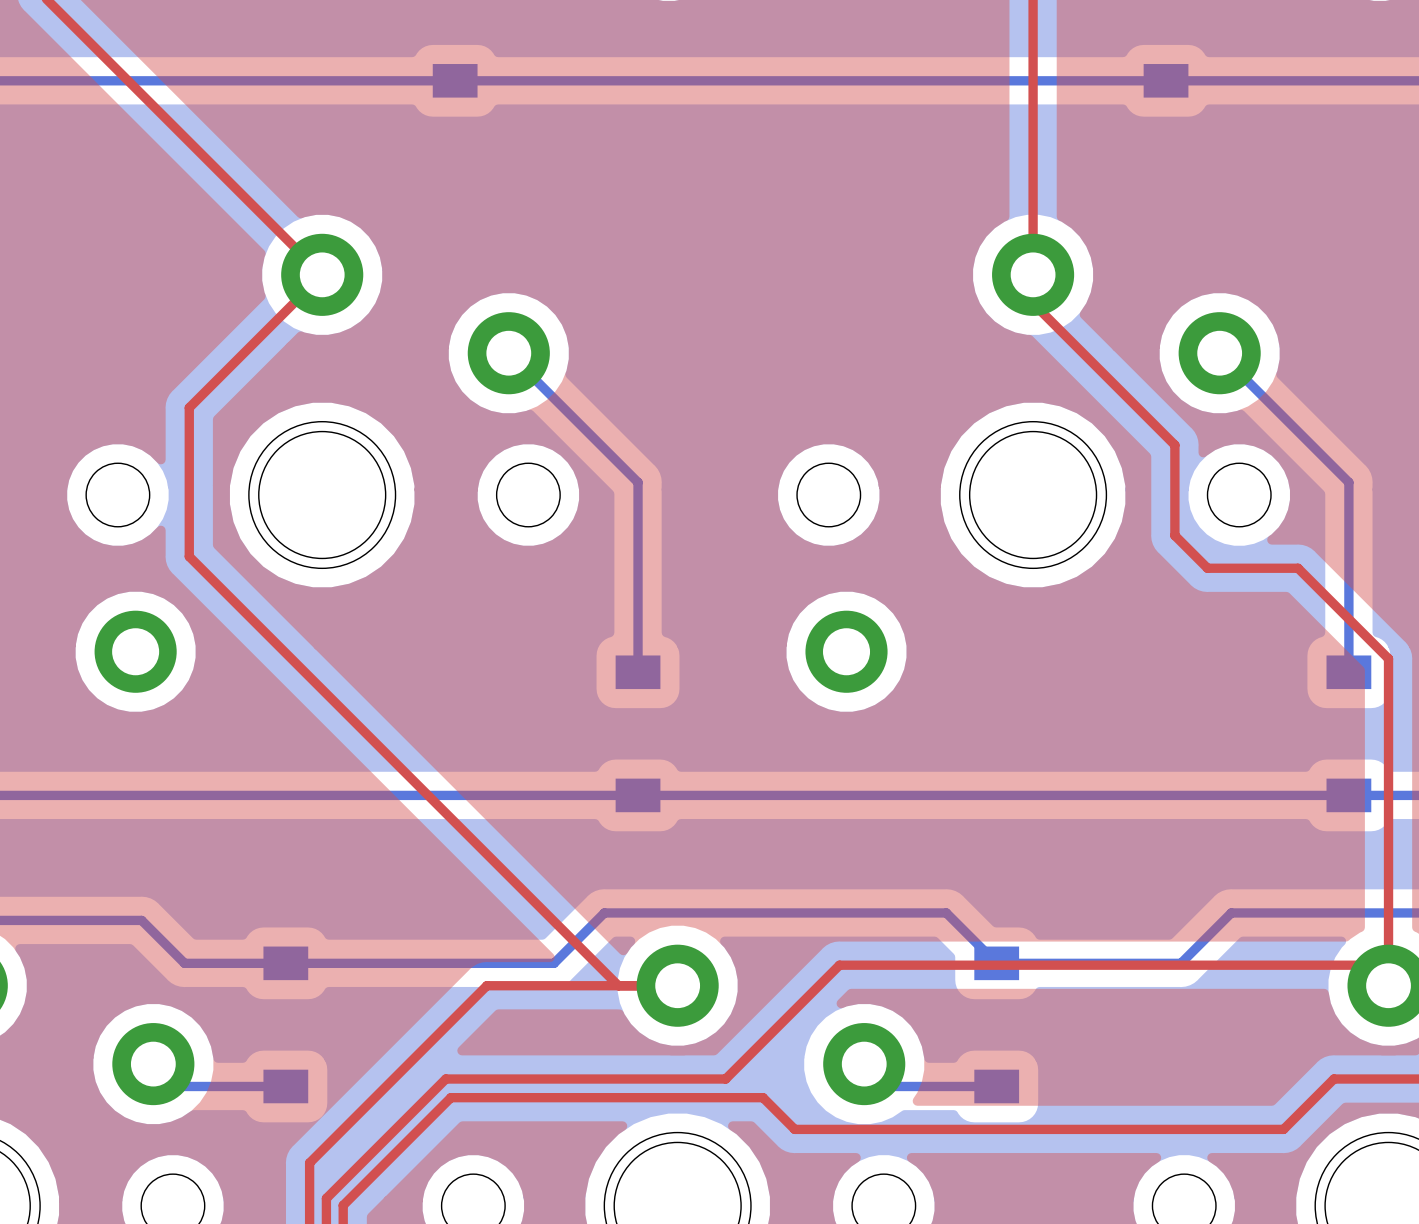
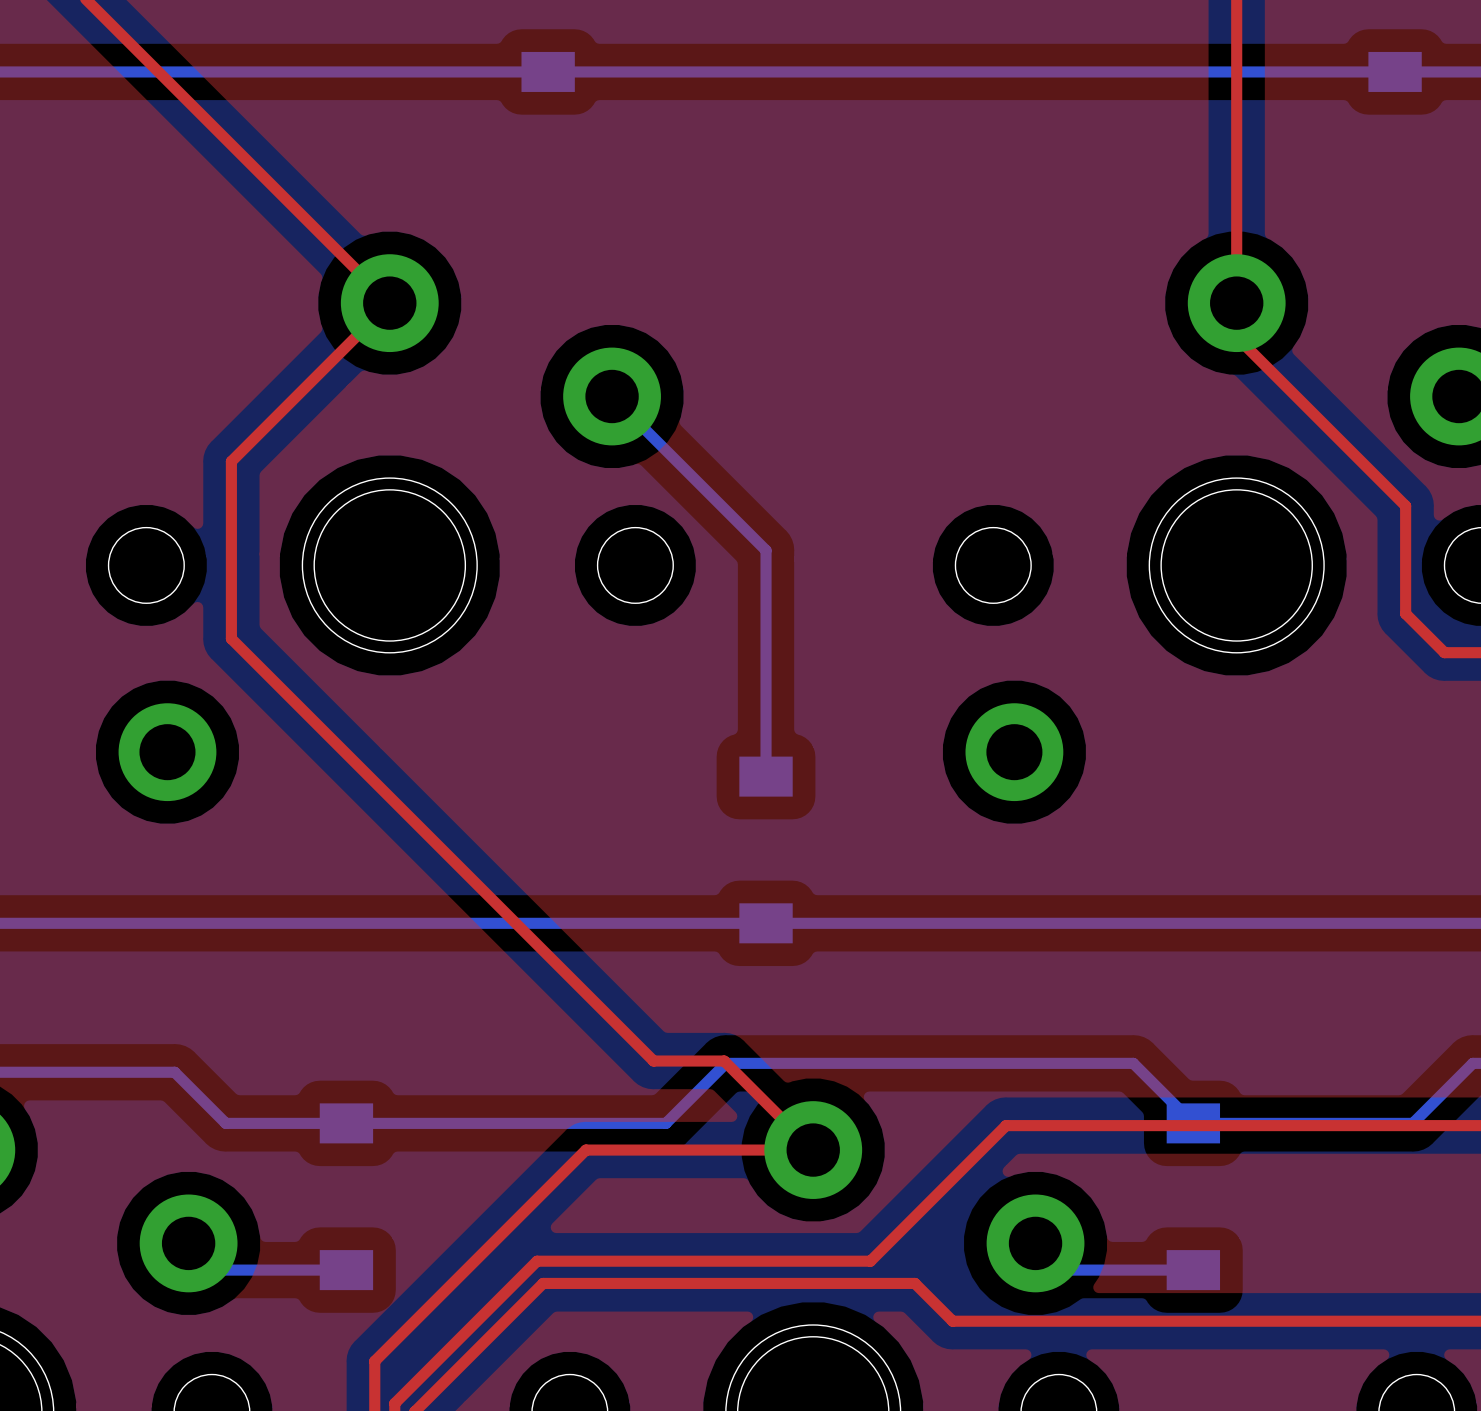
top track: (543, 911) (618, 985) -> (653, 1061) (724, 1061) (813, 1150)

